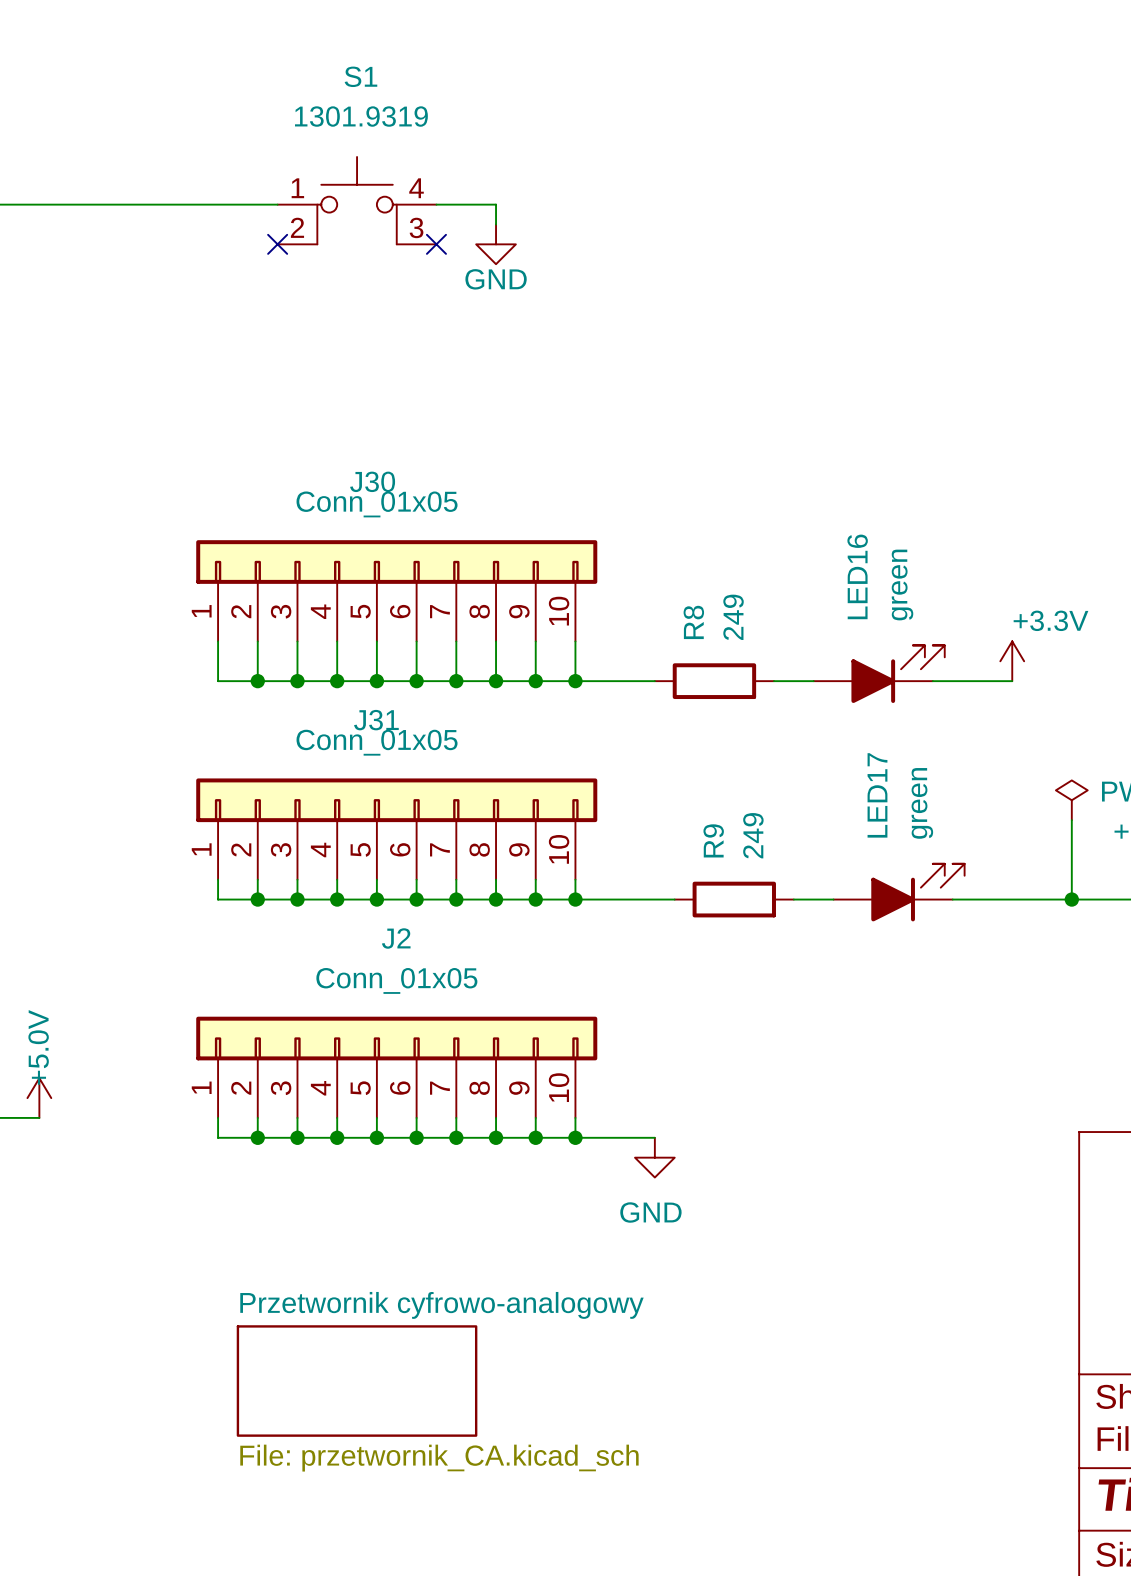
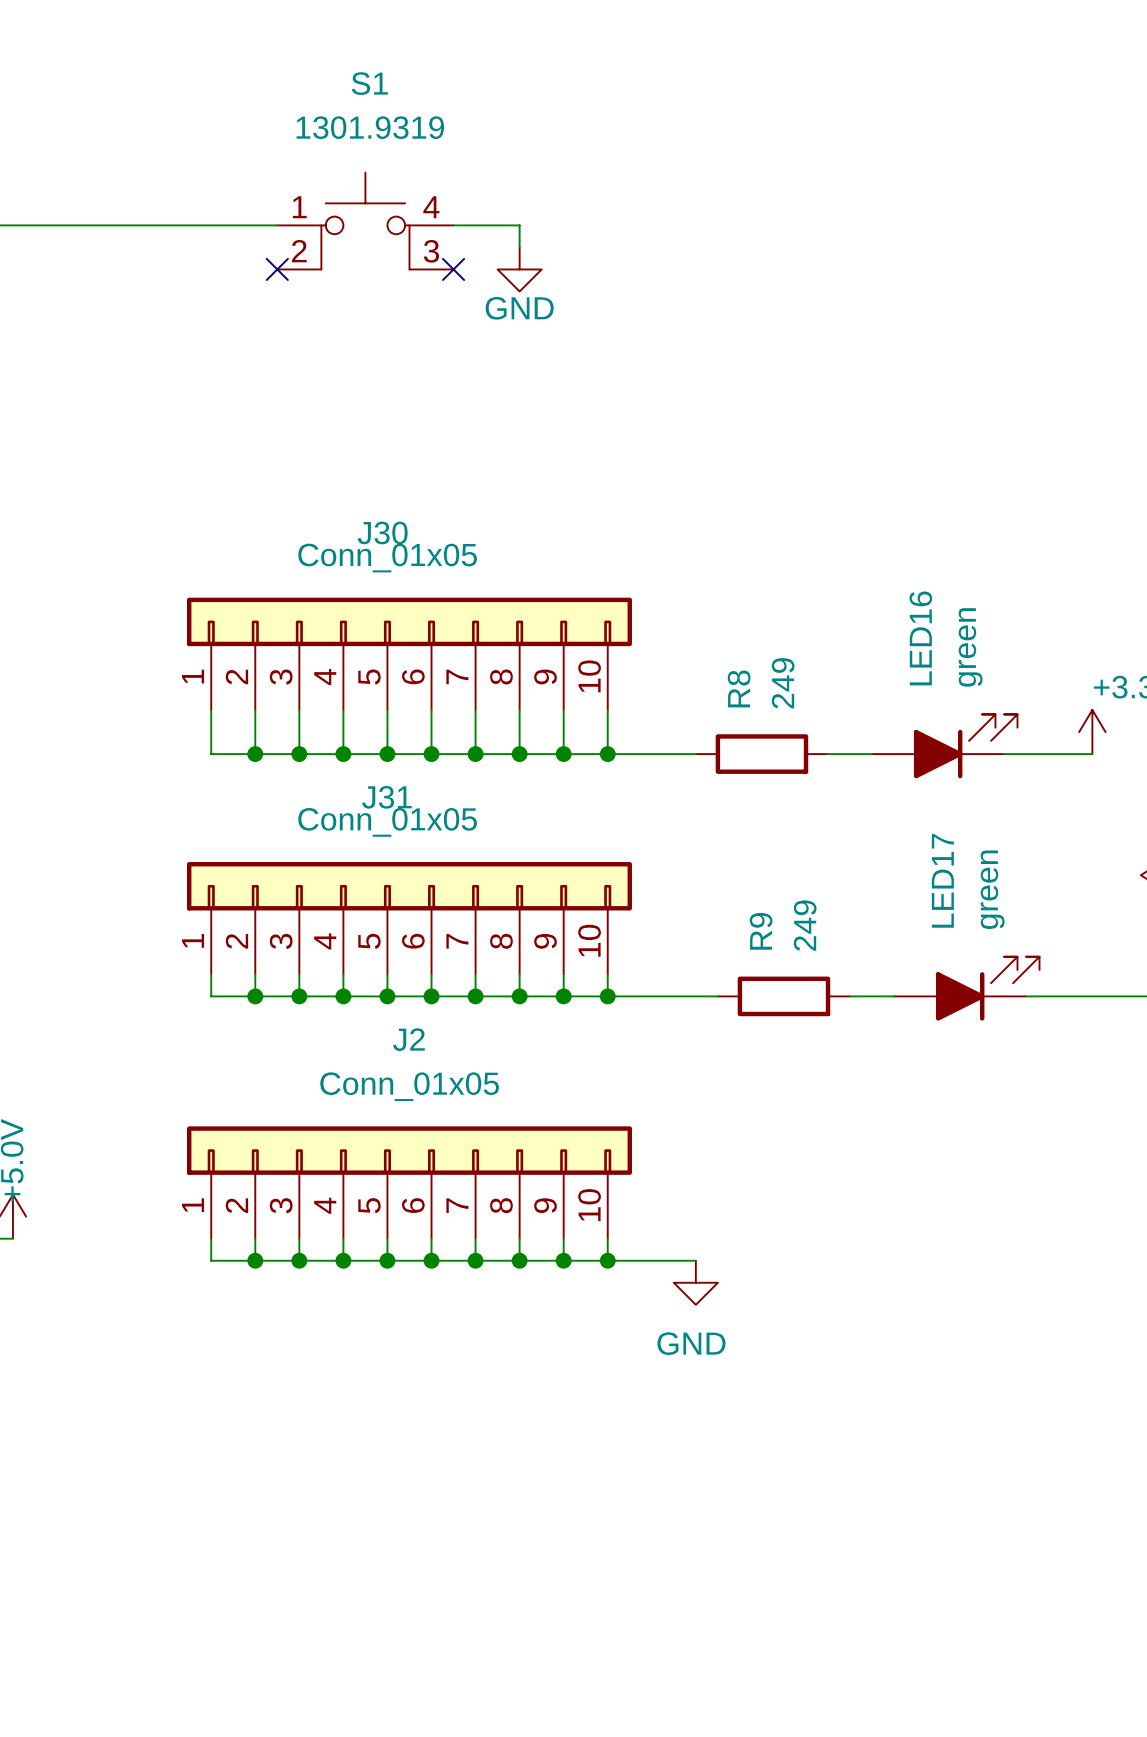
sheet Przetwornik cyfrowo-analogowy: File: przetwornik_CA.kicad_sch (357, 1381) -> none

